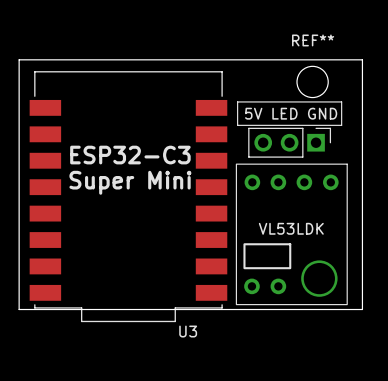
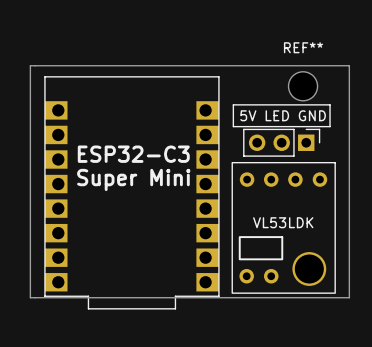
U3: (128, 196) -> none
part: none -> (131, 192)

